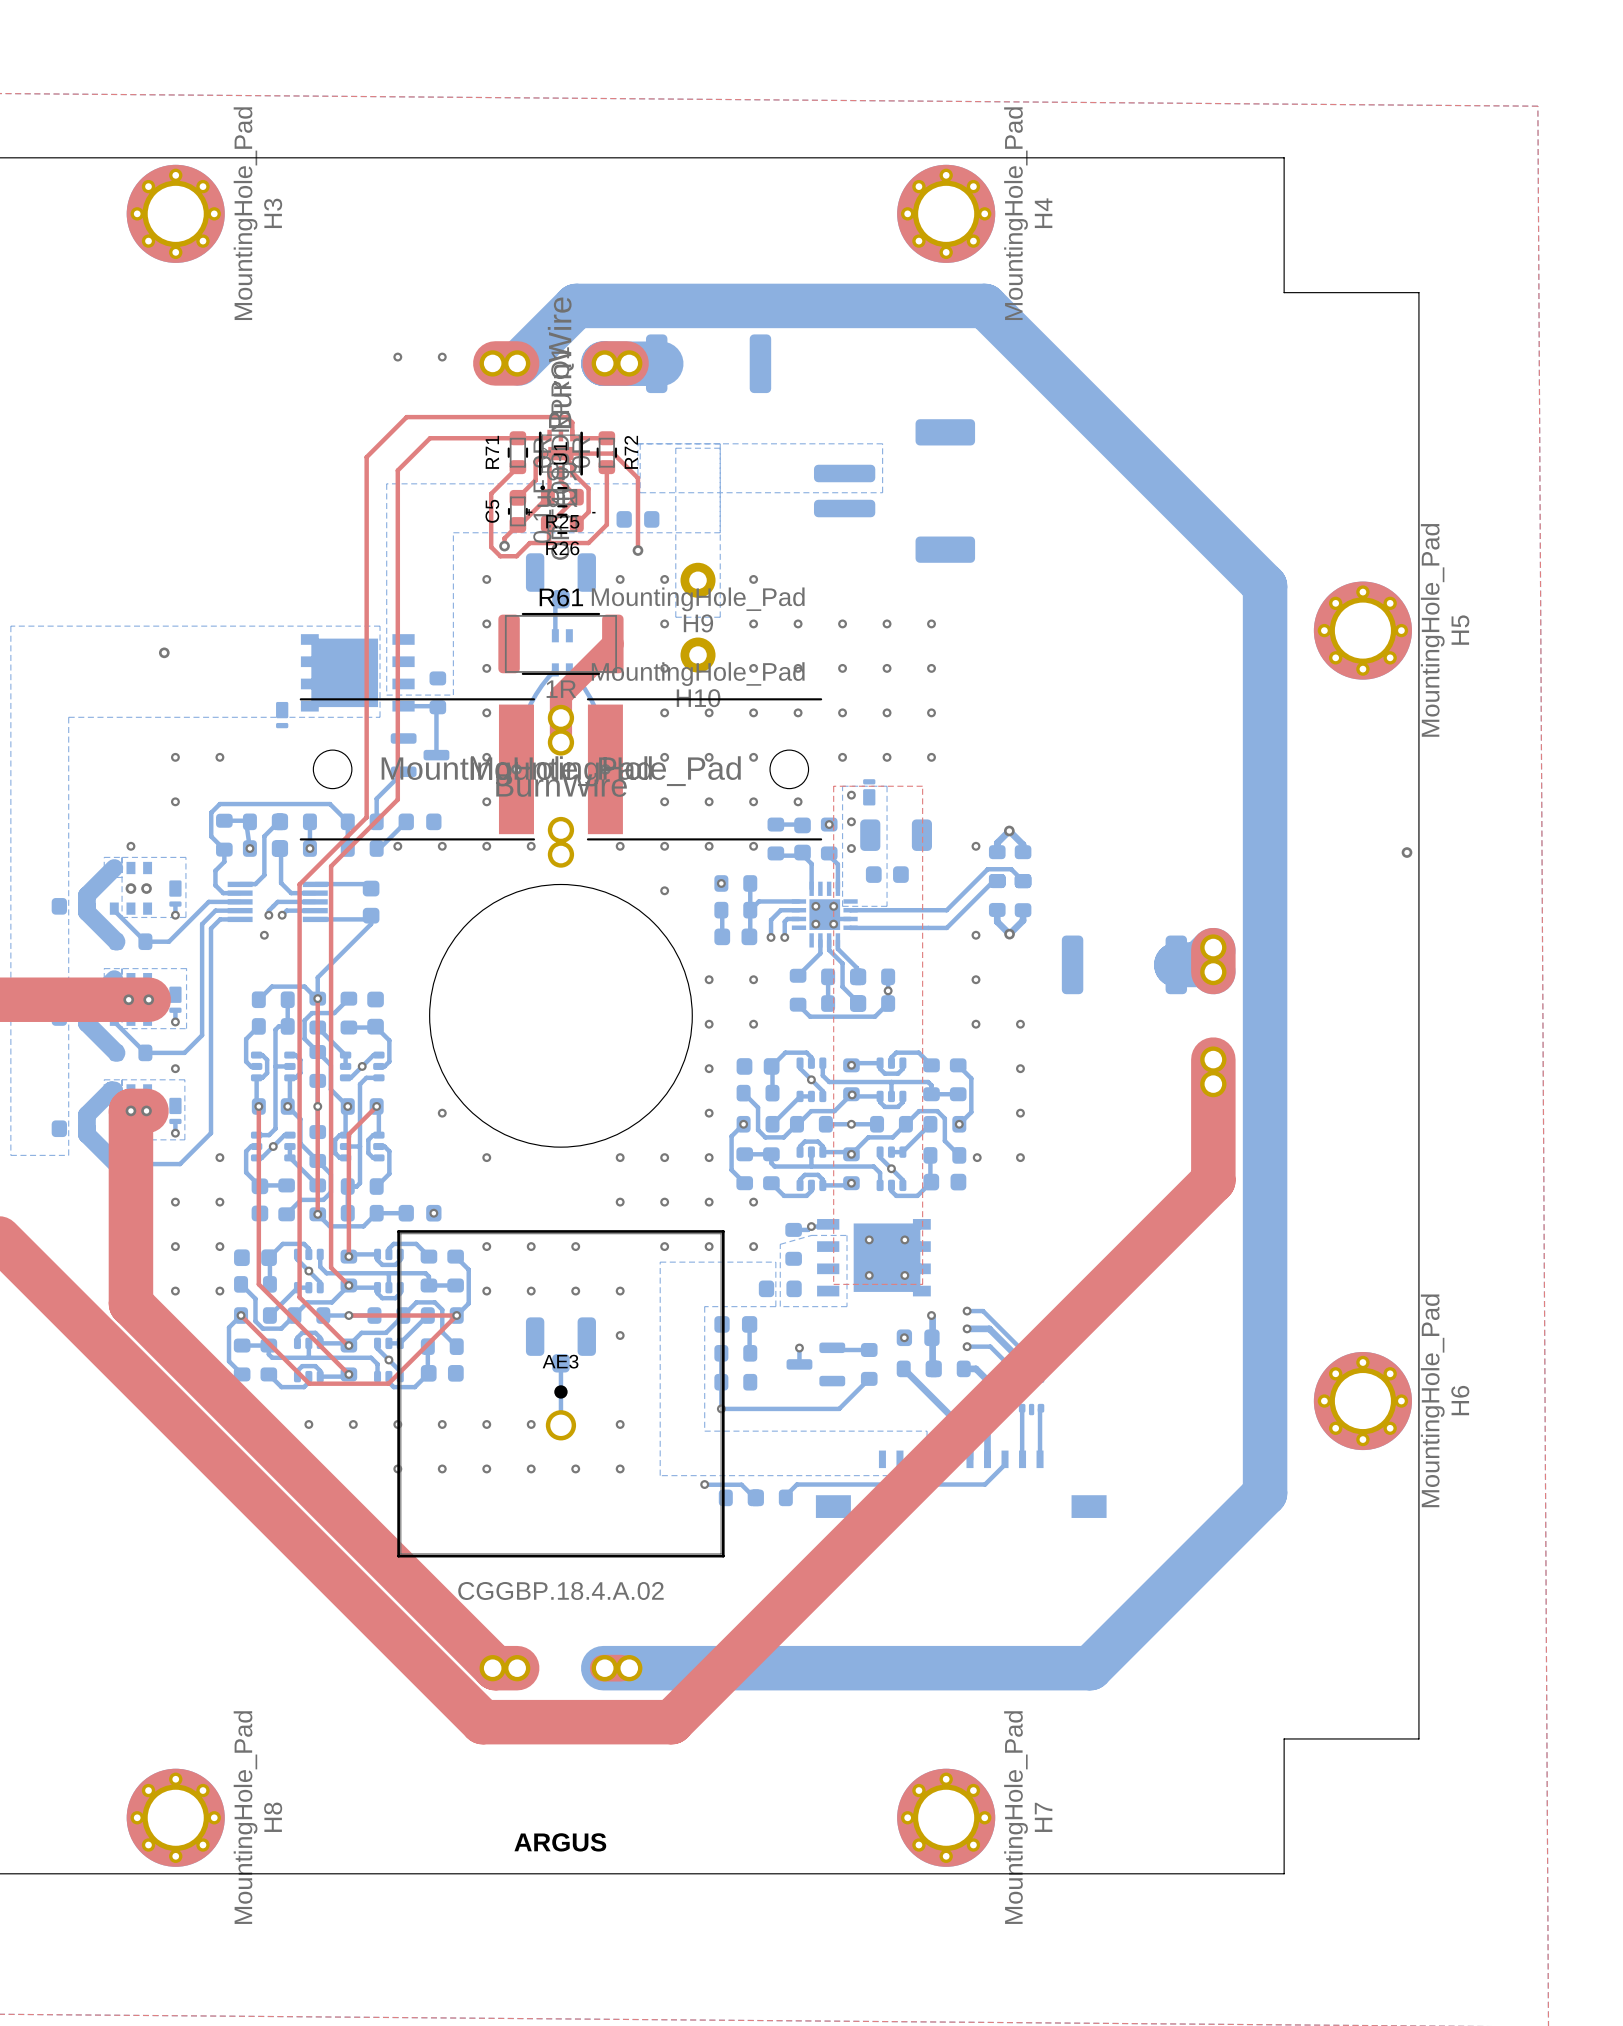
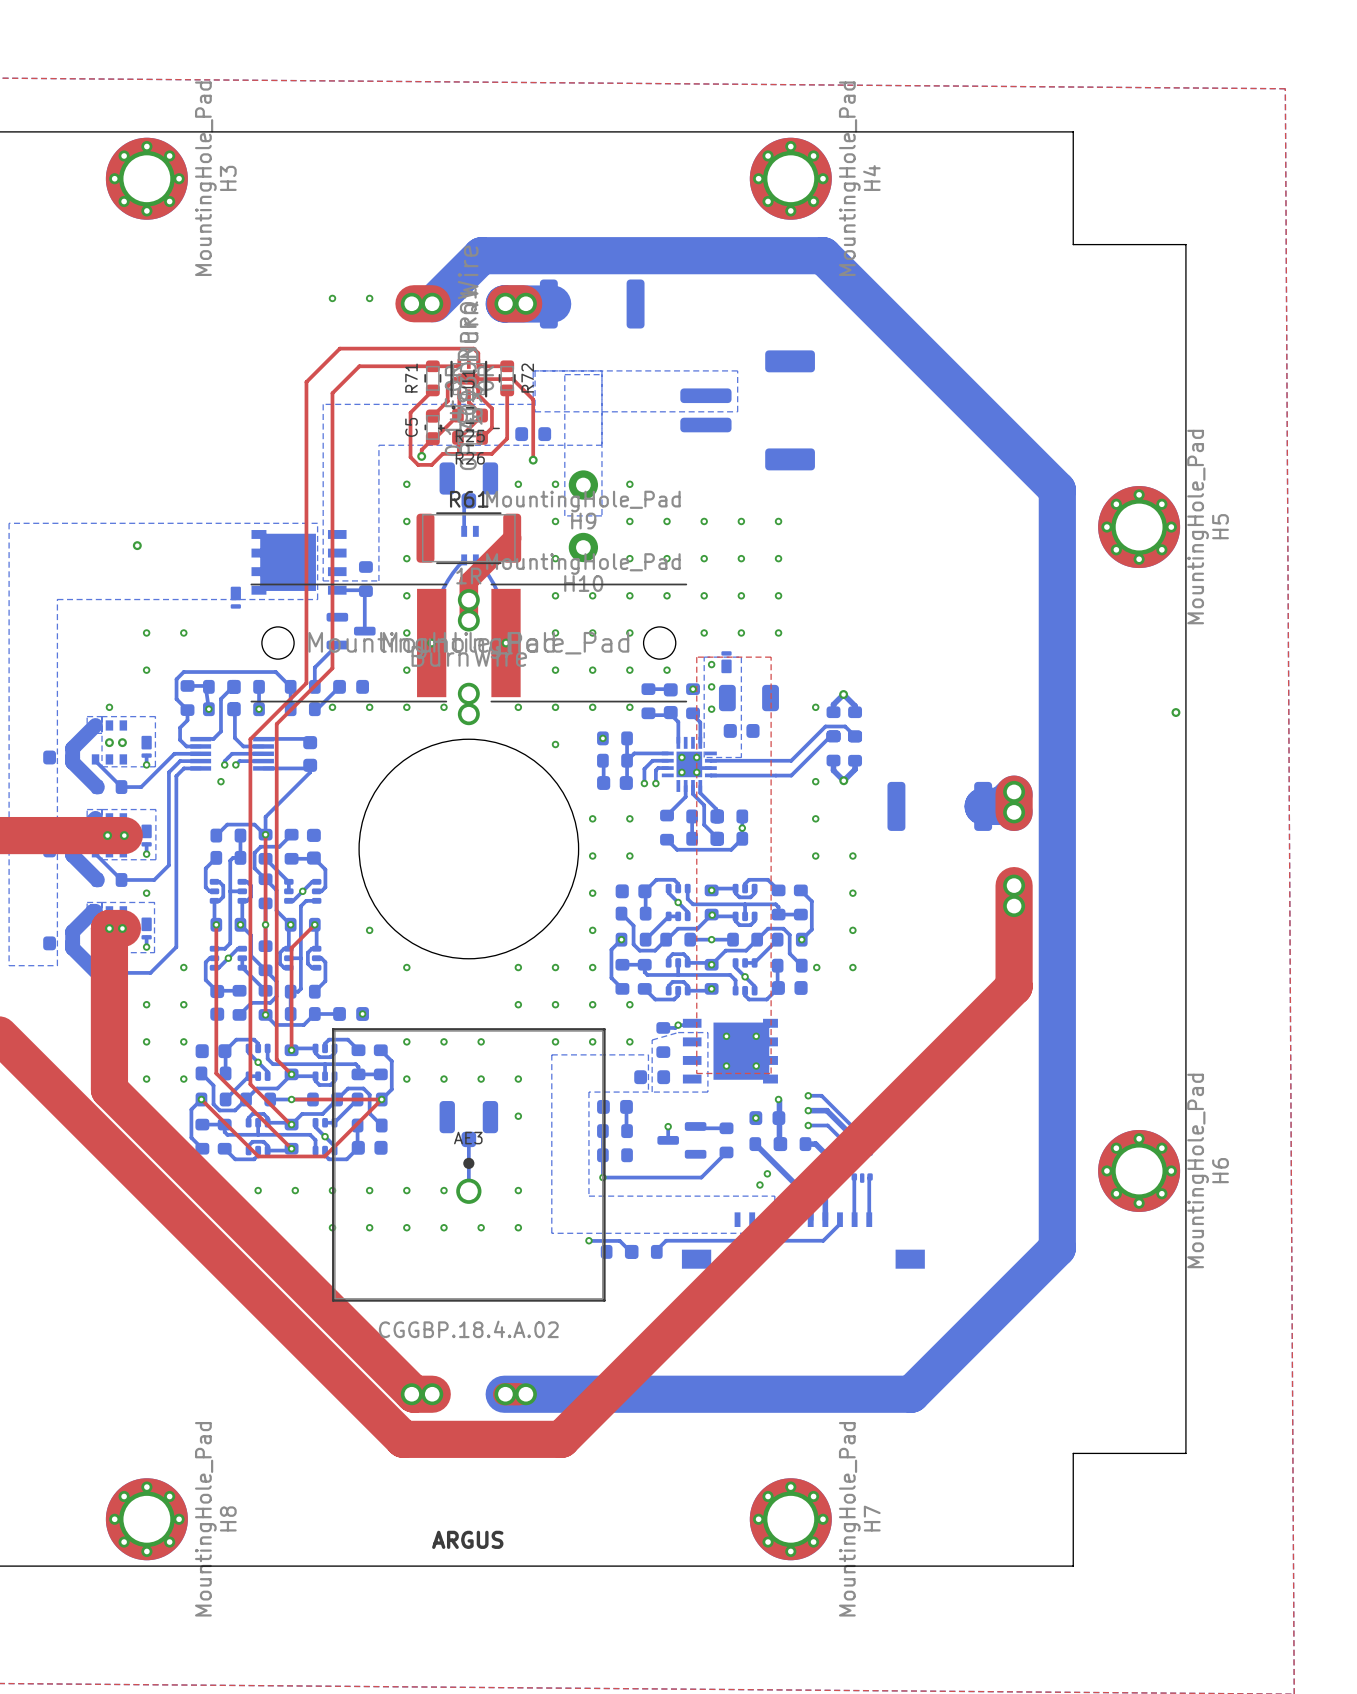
via: none -> (767, 1173)
via: none -> (759, 1184)

